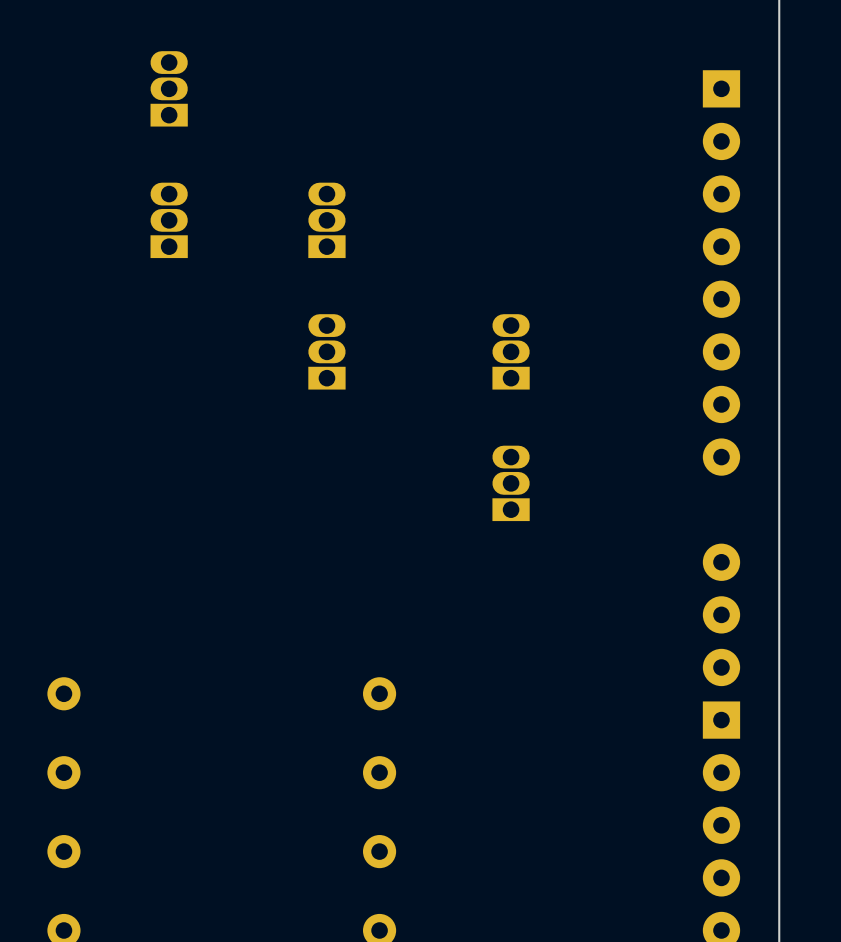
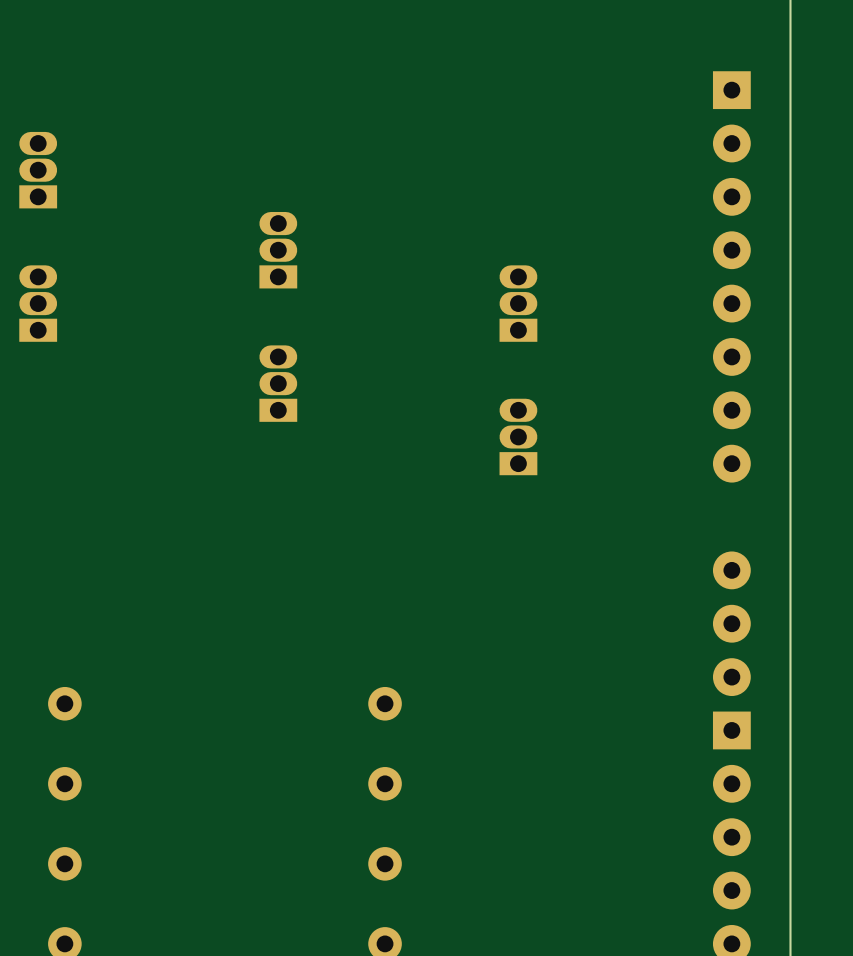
part: (169, 88) -> none
part: none -> (38, 170)
part: (169, 220) -> none
part: (326, 220) -> none
part: none -> (278, 250)
part: none -> (38, 303)
part: none -> (518, 303)
part: (326, 351) -> none
part: (511, 351) -> none
part: none -> (278, 383)
part: none -> (518, 436)
part: (511, 483) -> none

